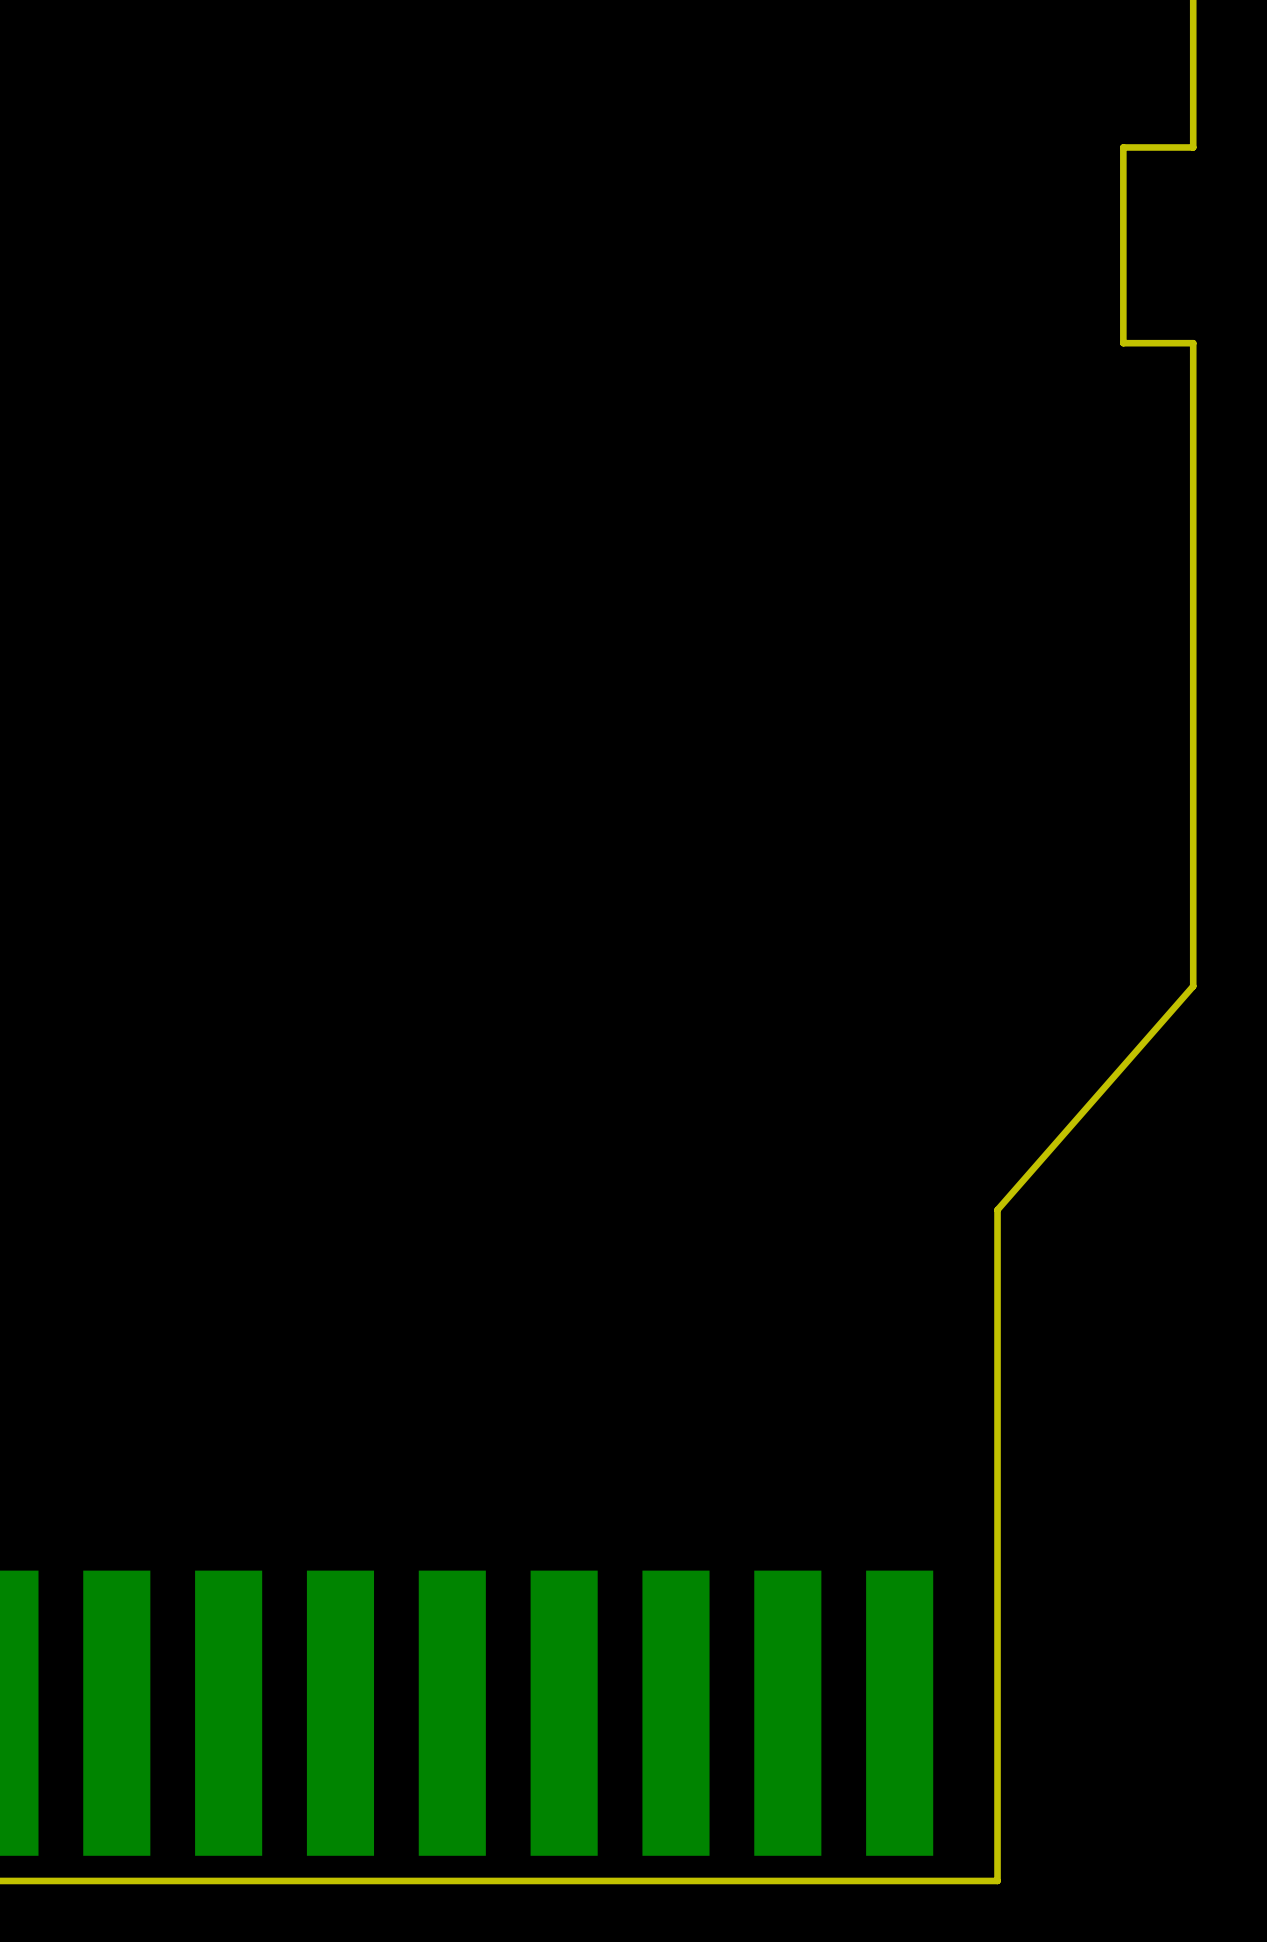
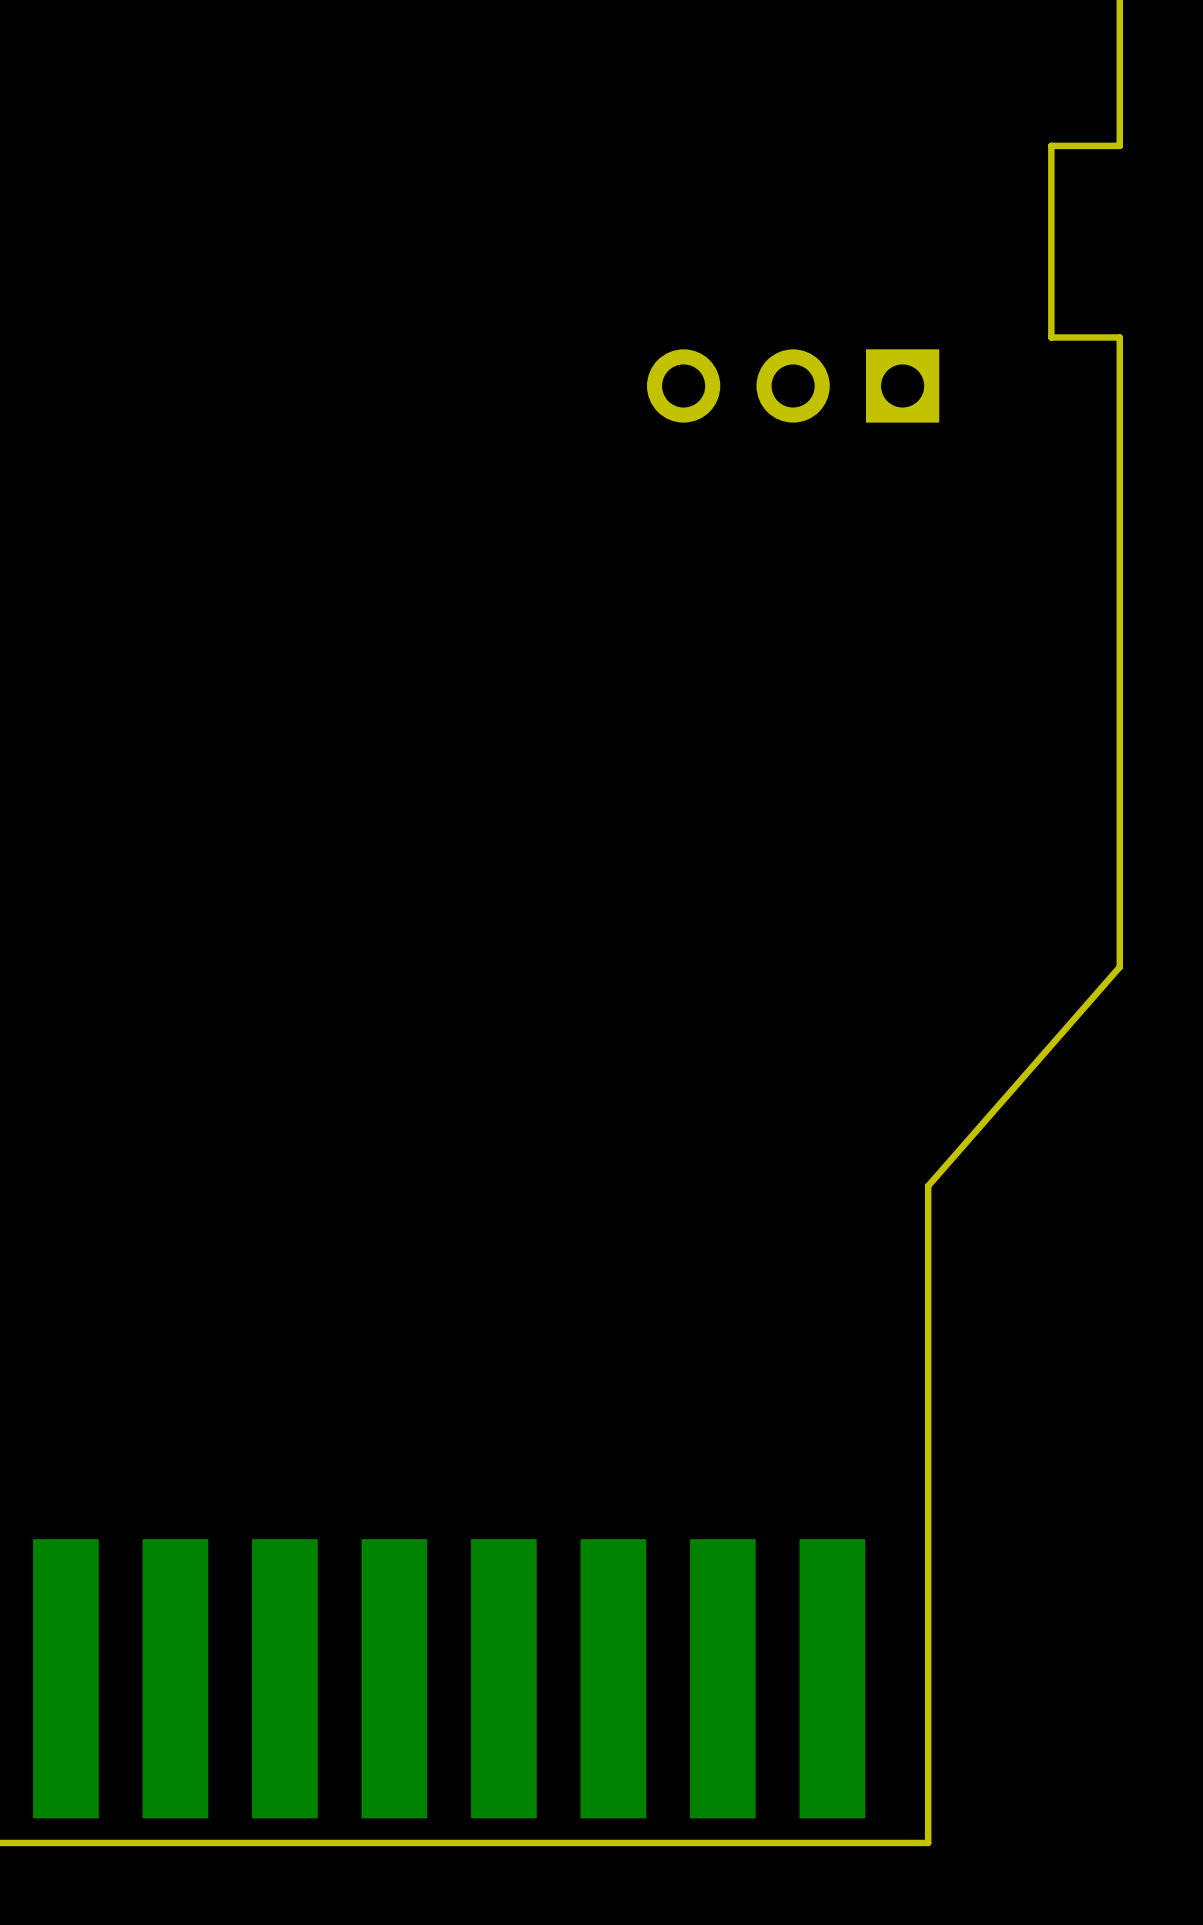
part: none -> (793, 385)

